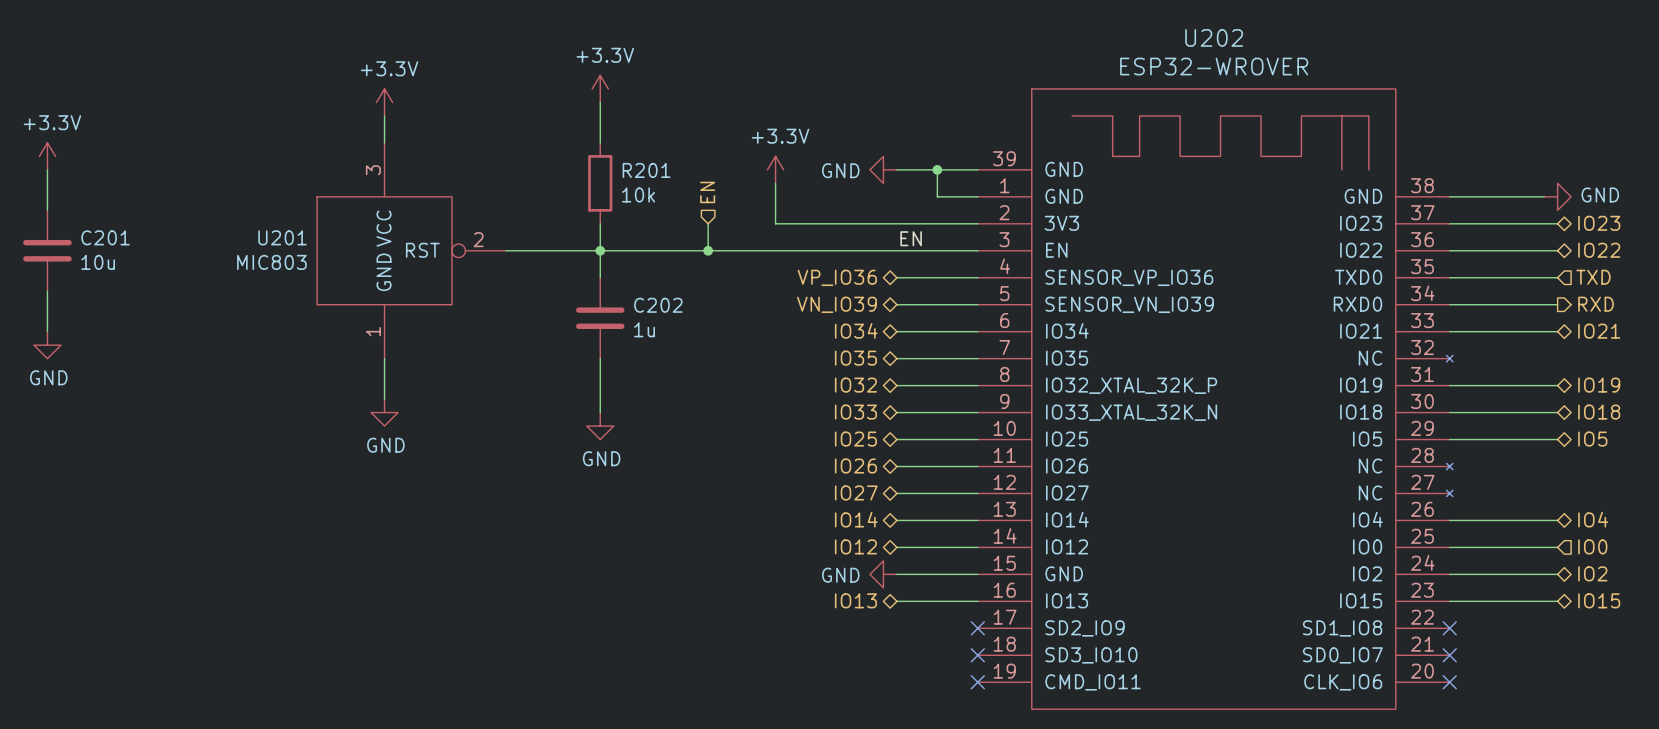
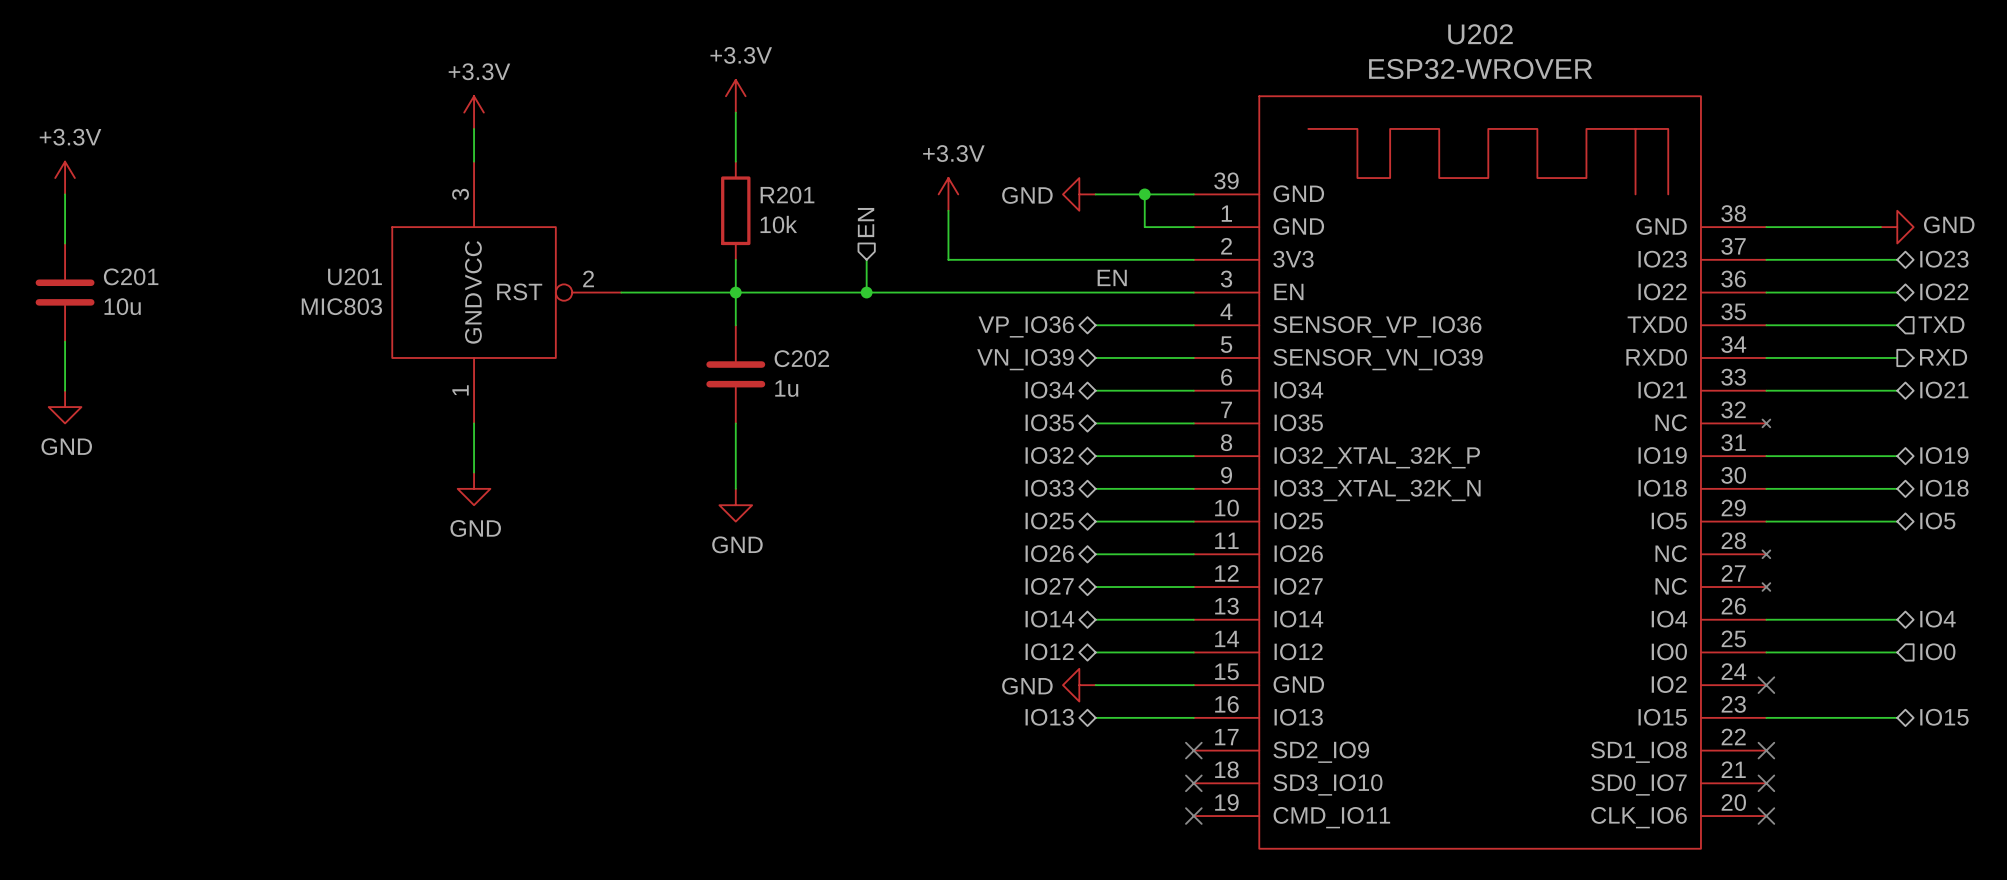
hierarchical label: IO2 (1592, 573) -> none
wire: (1449, 574) (1557, 574) -> none
no-connect mark: none -> (1766, 685)

